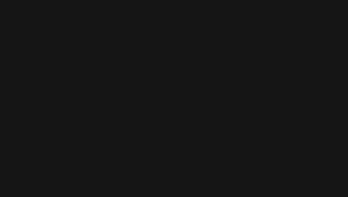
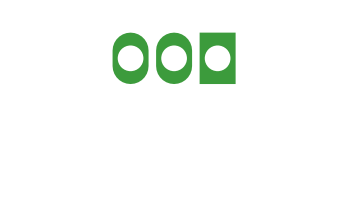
part: none -> (174, 58)

